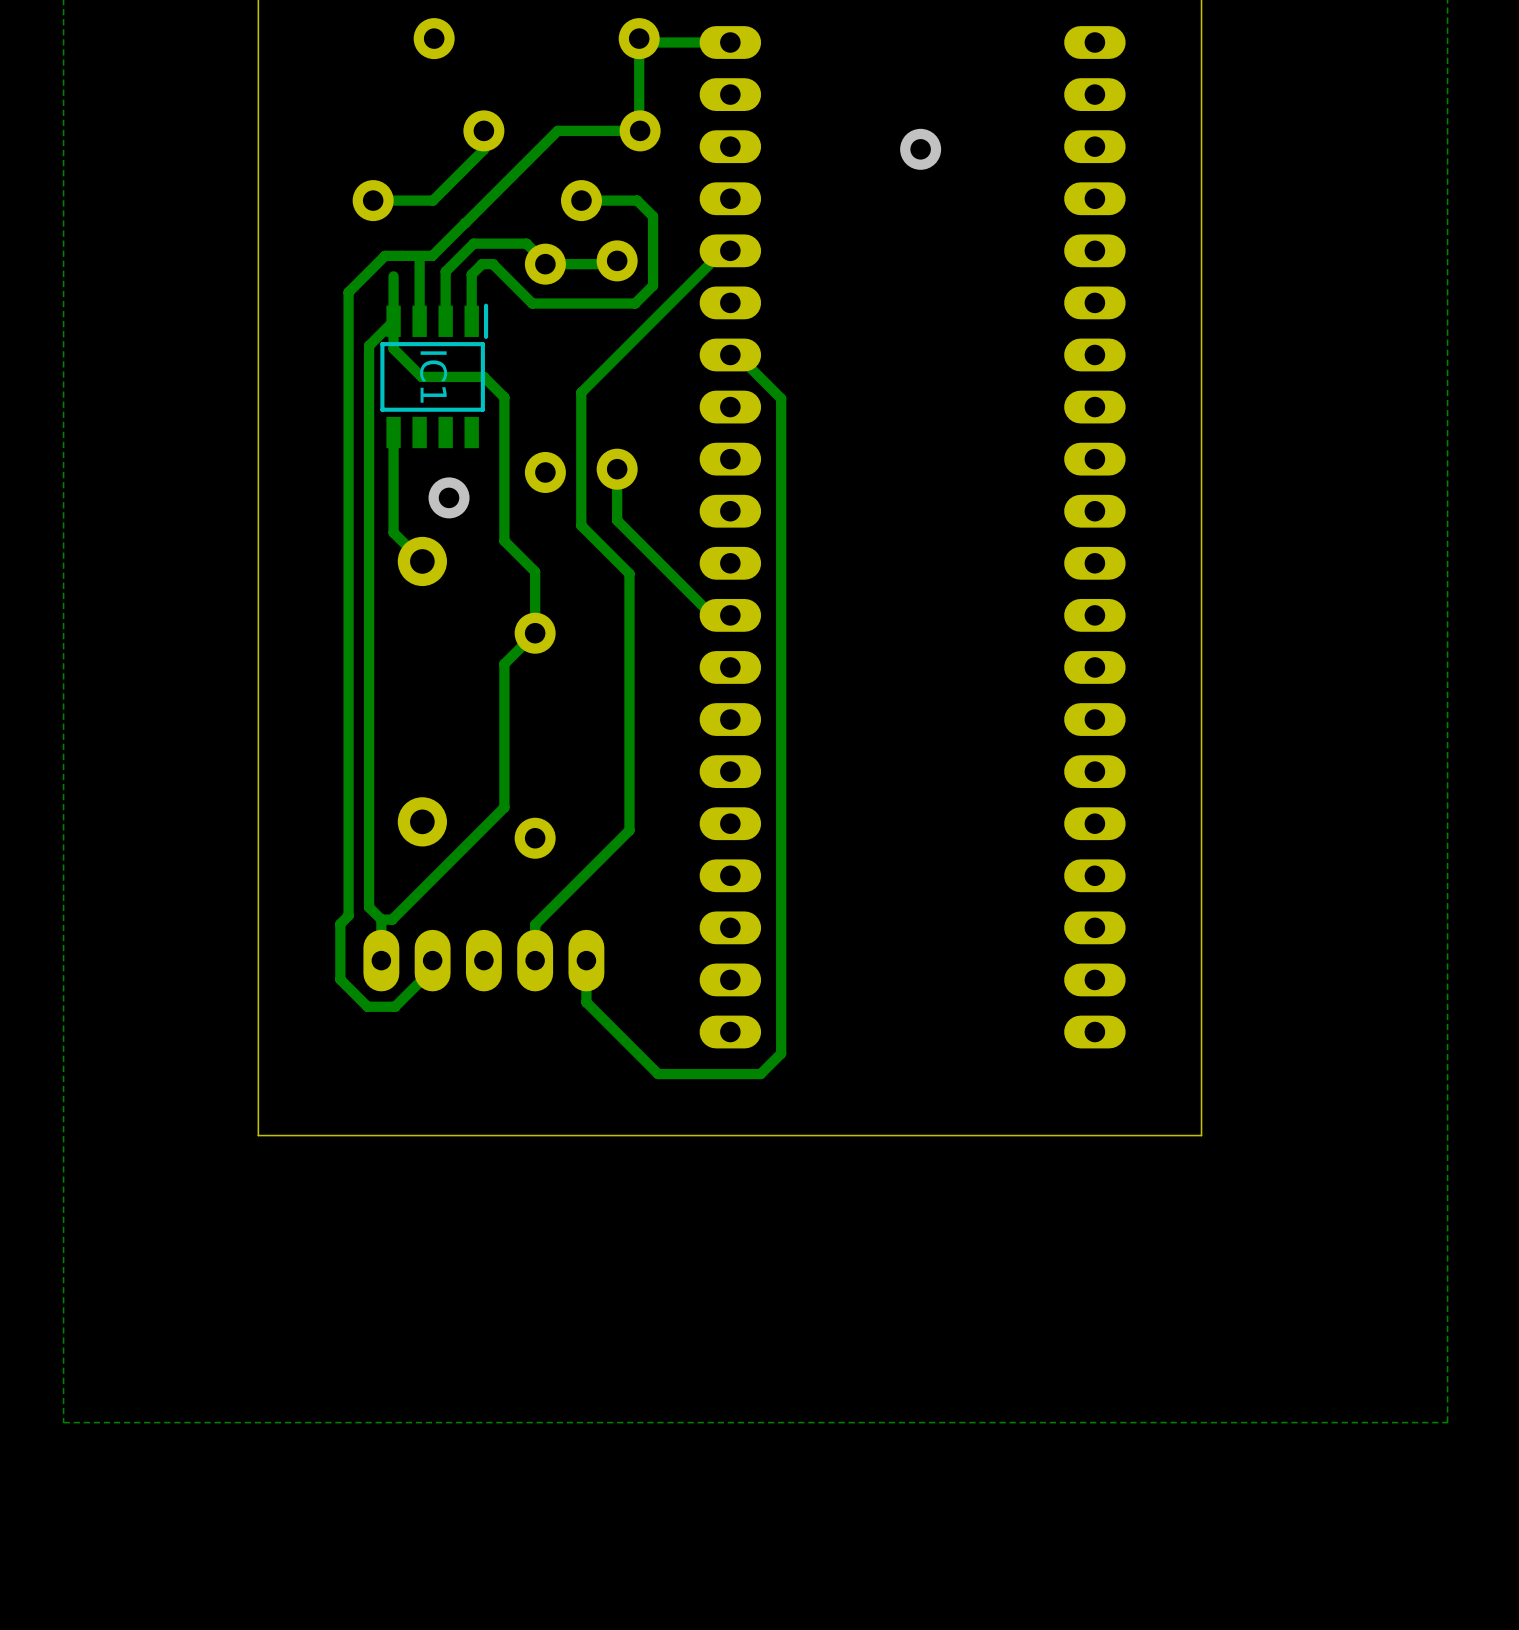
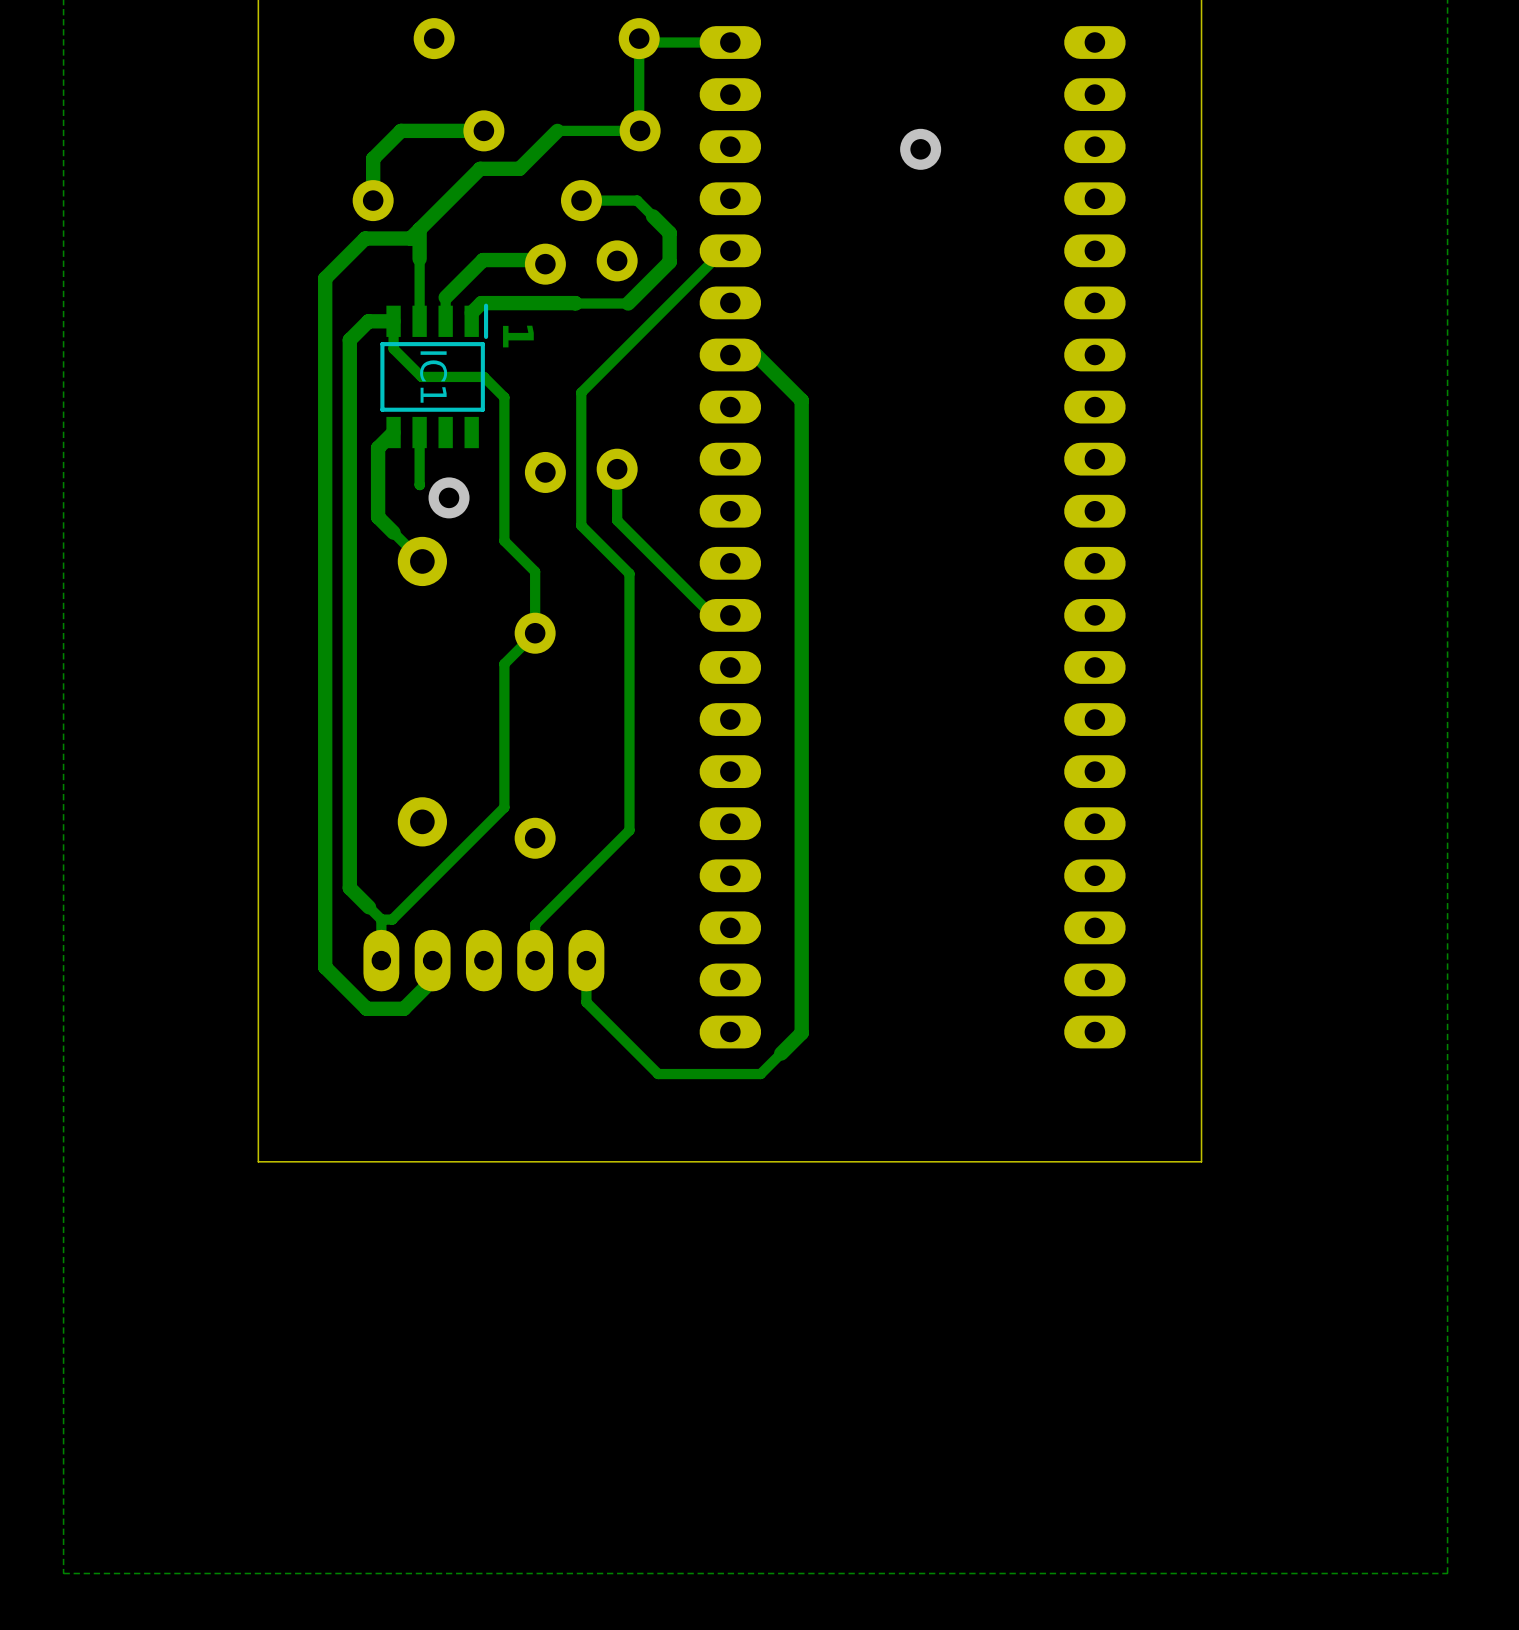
track: (483, 130) (483, 149) (433, 200) (373, 200) -> (483, 130) (401, 130) (373, 158) (373, 184) (364, 192)
track: (557, 130) (465, 223) -> none
track: (653, 216) (653, 285) (635, 303) (628, 303) -> (653, 216) (669, 232) (669, 262) (628, 303)
track: (465, 223) (432, 255) (385, 255) (348, 292) (348, 915) (340, 924) (340, 979) (367, 1006) (395, 1006) (432, 969) -> (557, 130) (519, 168) (480, 168) (410, 238) (365, 238) (325, 278) (325, 967) (366, 1008) (403, 1008) (432, 980) (432, 969)
track: none -> (419, 229) (419, 258)
track: (617, 260) (613, 264) (545, 264) (526, 243) (473, 243) (445, 271) (445, 297) -> (542, 260) (483, 260) (445, 297)
track: (393, 276) (393, 321) (369, 345) (369, 907) -> (393, 321) (368, 321) (349, 340) (349, 888) (369, 907)
track: (575, 303) (532, 303) (492, 264) (482, 264) (471, 274) (471, 312) -> (575, 303) (481, 303) (471, 312)
text: none -> 1 (518, 336)
track: (737, 354) (781, 398) (781, 1053) -> (737, 354) (756, 354) (801, 400) (801, 1033) (781, 1053)
track: (393, 432) (393, 532) -> (393, 432) (378, 448) (378, 517) (393, 532)
track: none -> (419, 432) (419, 485)
board edge: (1201, 1135) (258, 1135) -> (1201, 1135) (1201, 1161) (258, 1161) (258, 1135)
zone outline: (1447, 1422) (63, 1422) -> (1447, 1422) (1447, 1573) (63, 1573) (63, 1422)

